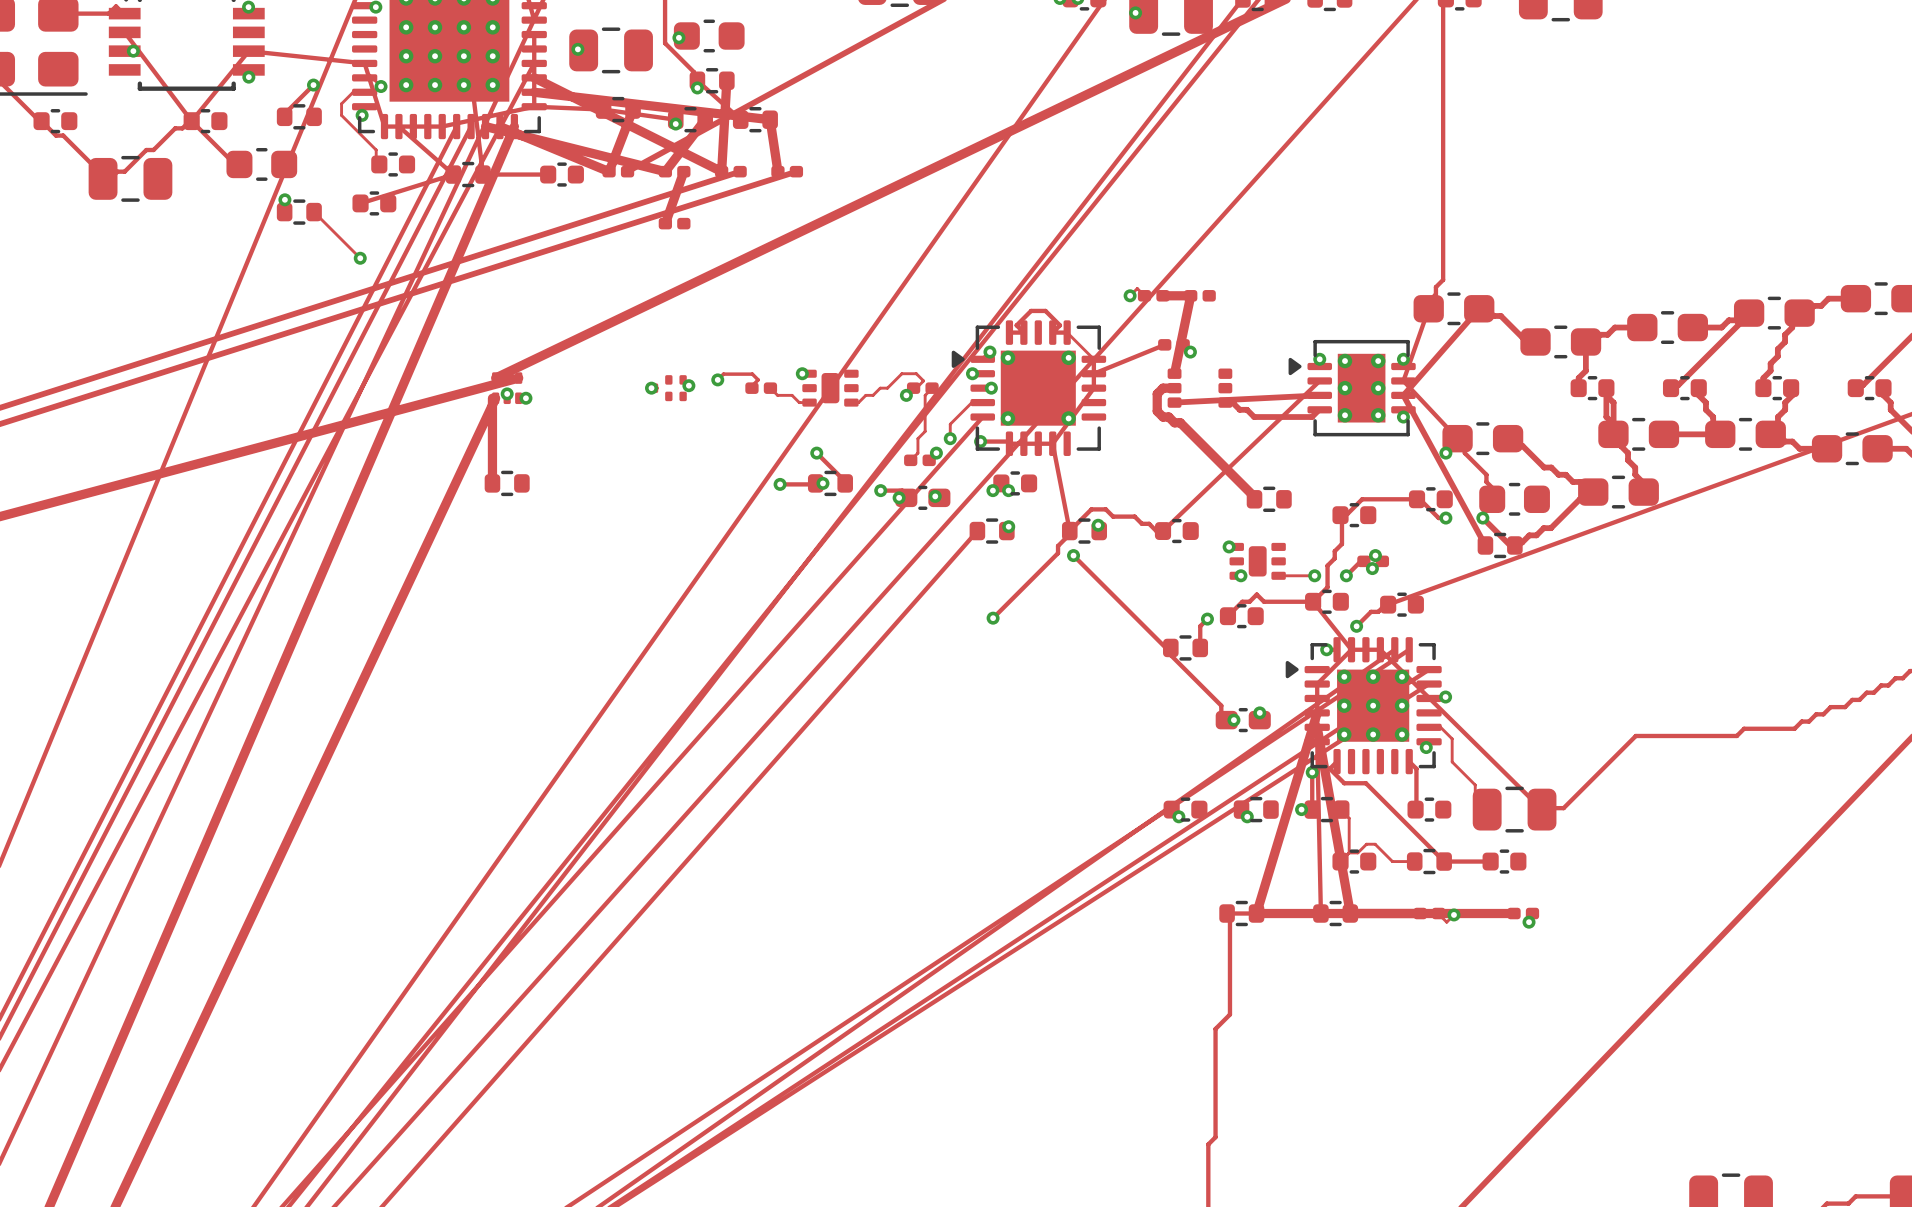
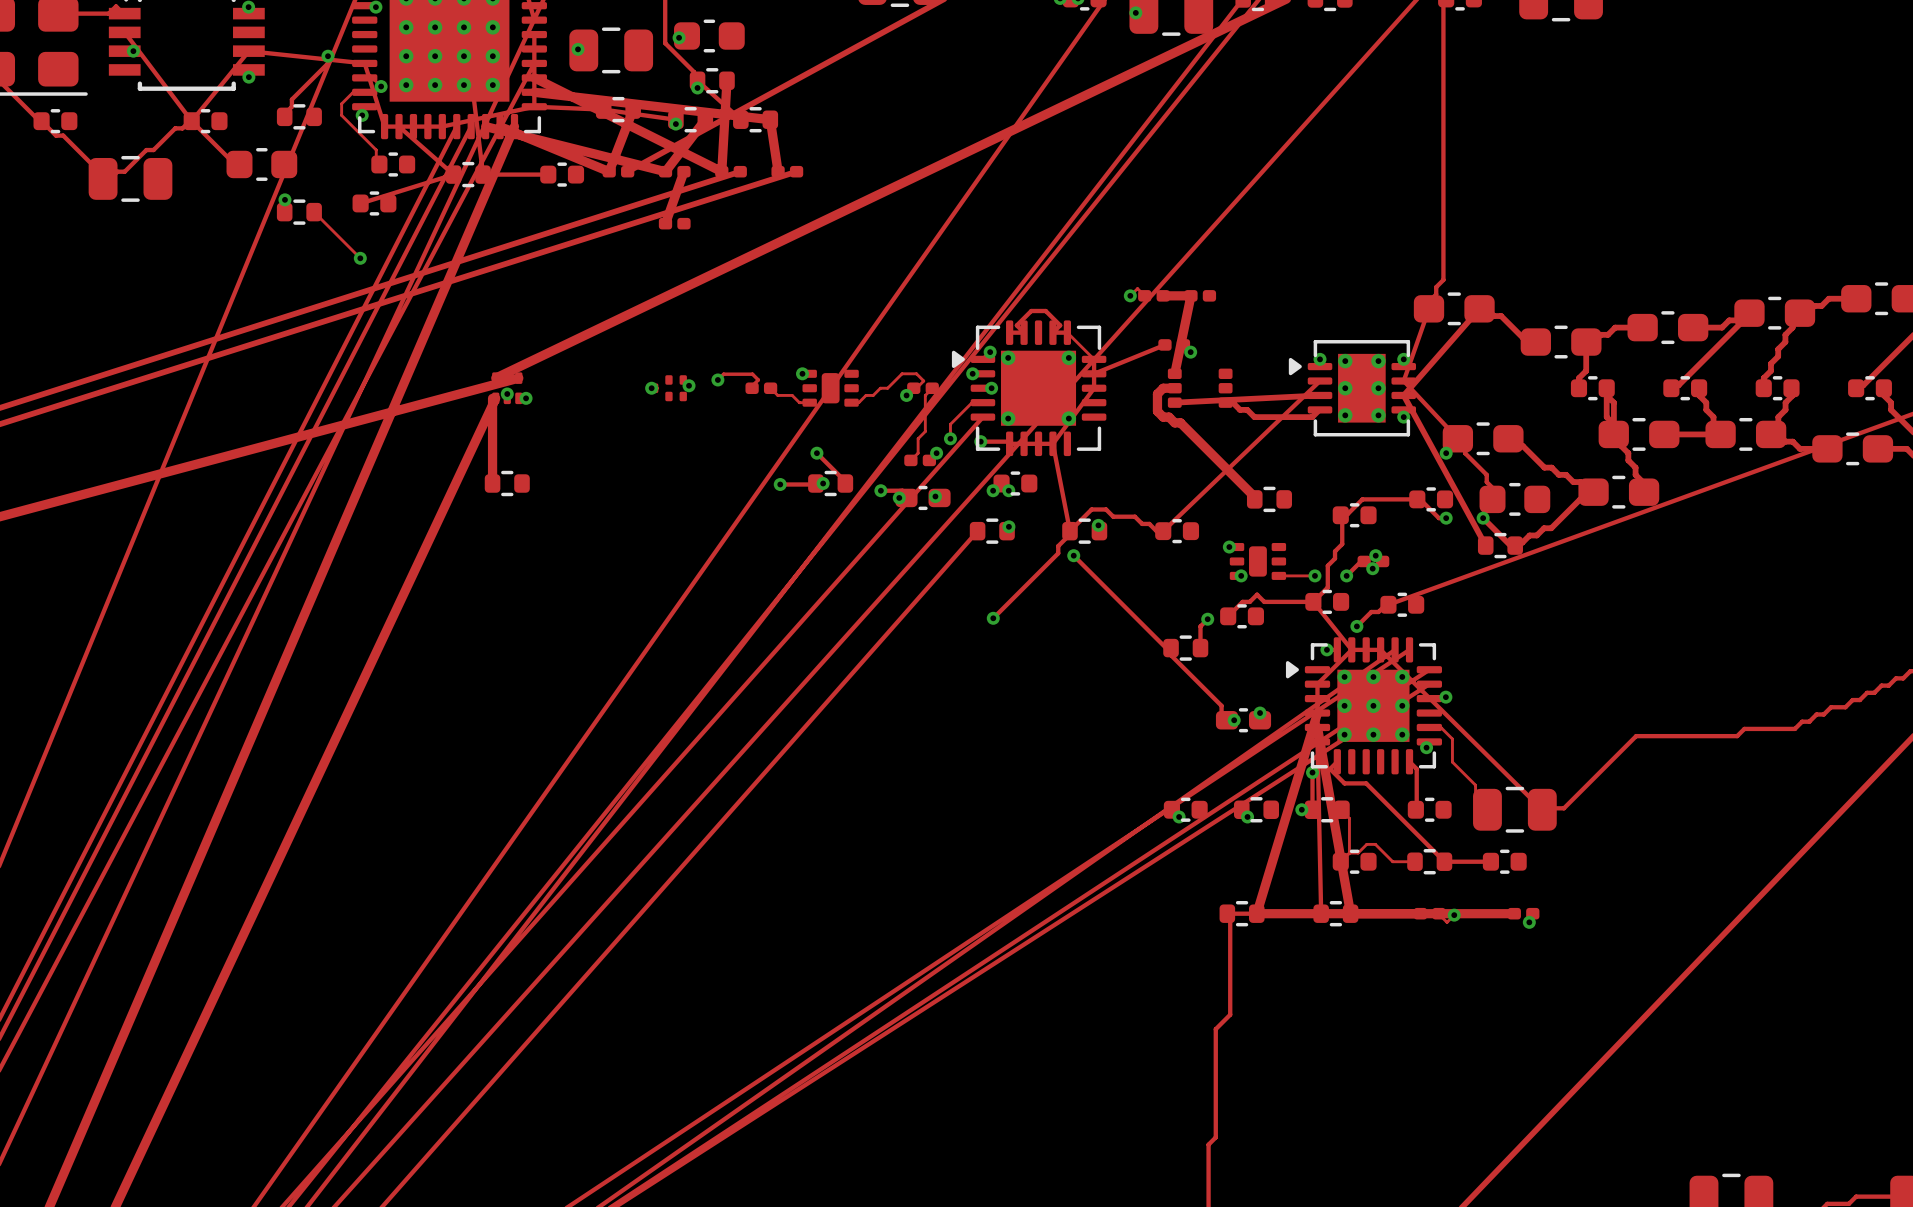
track: (313, 85) (291, 106) -> (327, 56) (327, 63) (291, 99) (291, 106)
via position: (313, 85) -> (327, 56)

